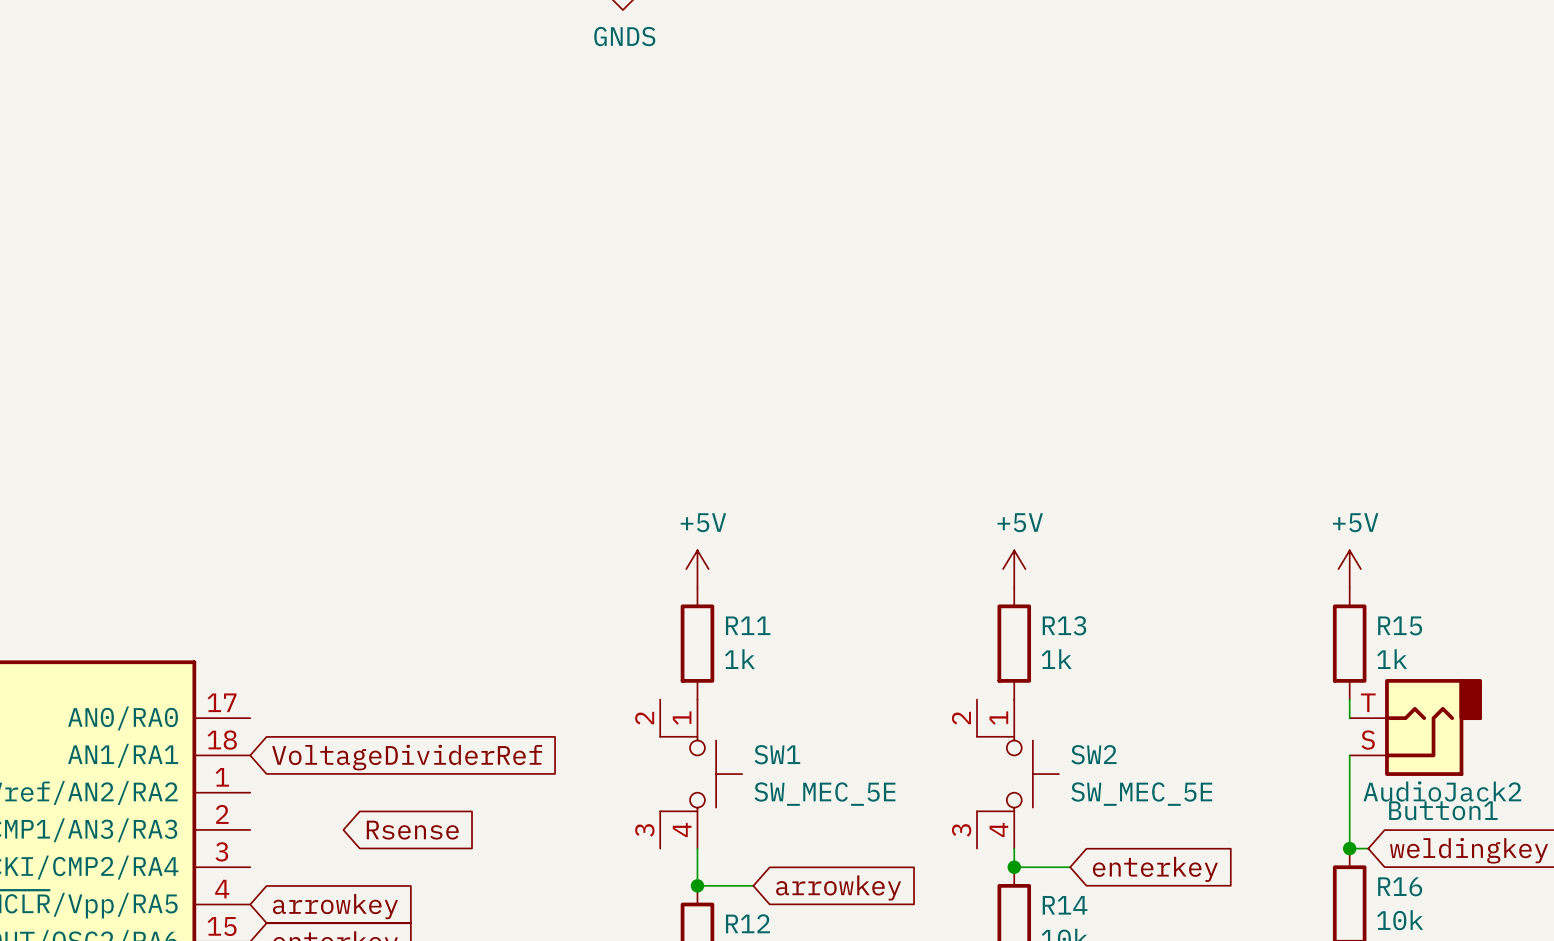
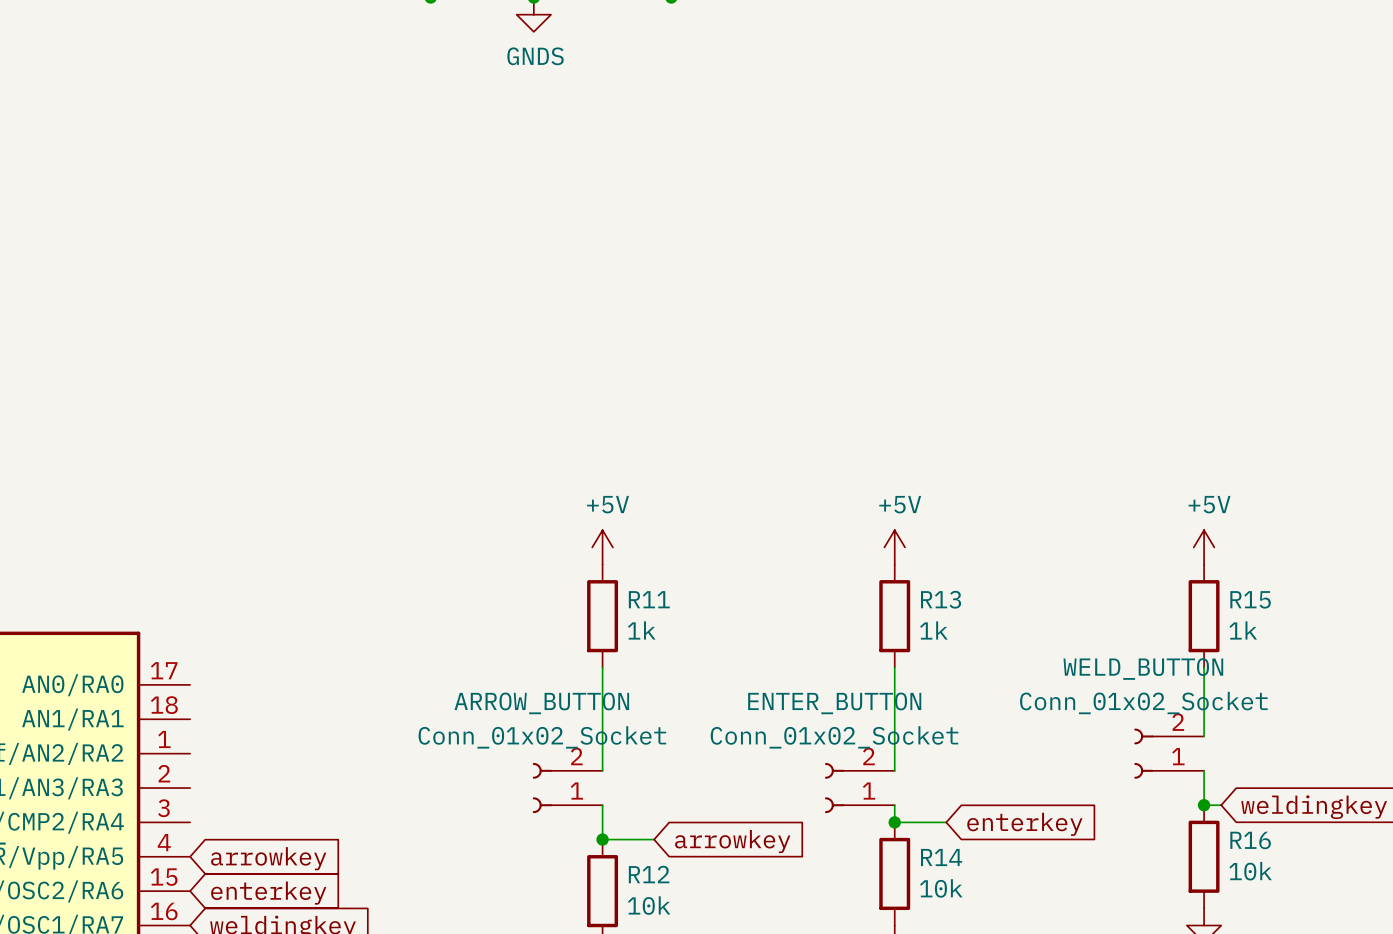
wire: none -> (602, 667) (602, 770)
wire: none -> (894, 667) (894, 770)
Button1: AudioJack2 (1415, 727) -> none
global label: VoltageDividerRef (407, 757) -> none
SW1: SW_MEC_5E (701, 774) -> none
SW2: SW_MEC_5E (1017, 774) -> none
wire: (1349, 774) (1349, 811) -> (1204, 684) (1204, 719)
WELD_BUTTON: none -> Conn_01x02_Socket (1169, 753)
ARROW_BUTTON: none -> Conn_01x02_Socket (567, 788)
ENTER_BUTTON: none -> Conn_01x02_Socket (859, 788)
global label: Rsense (412, 830) -> none

